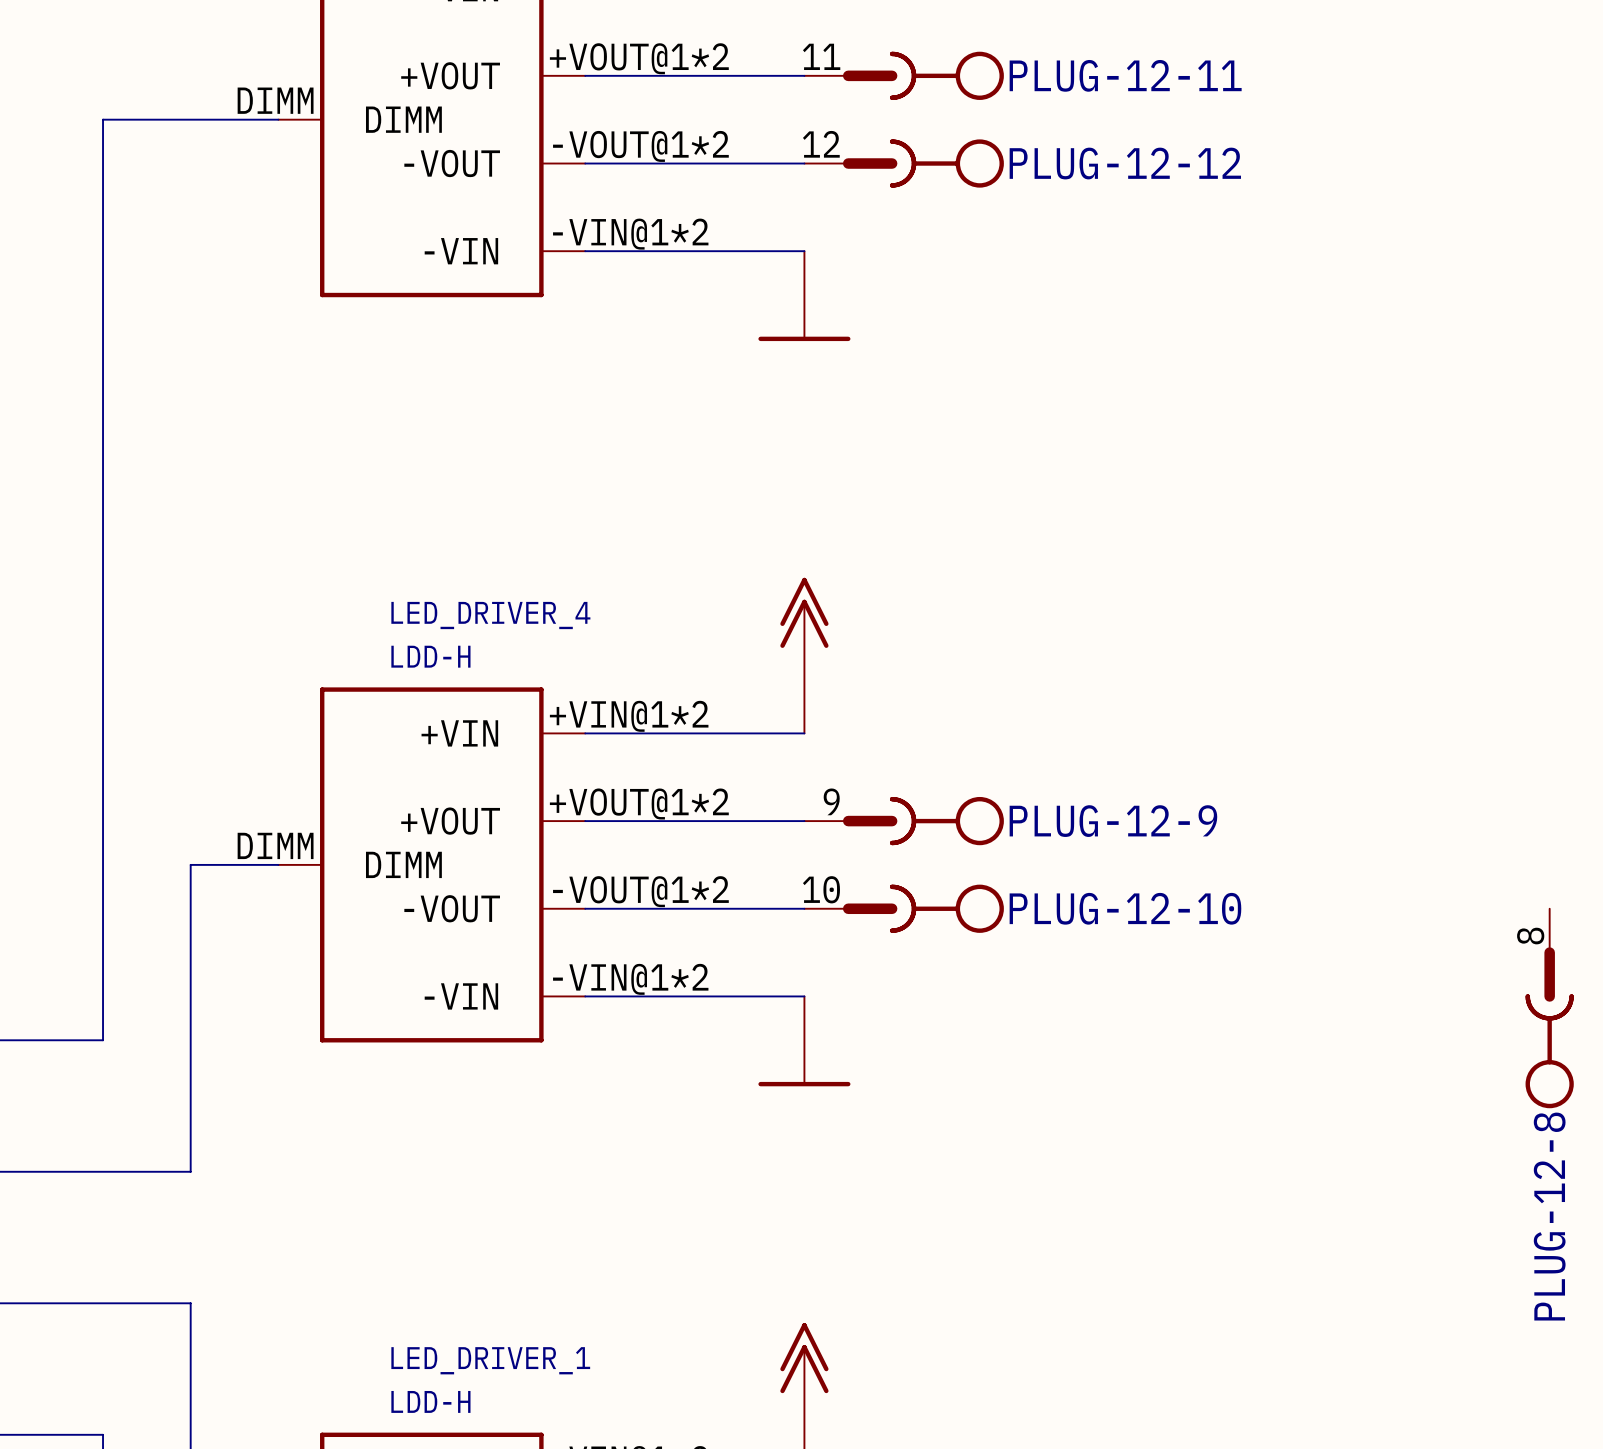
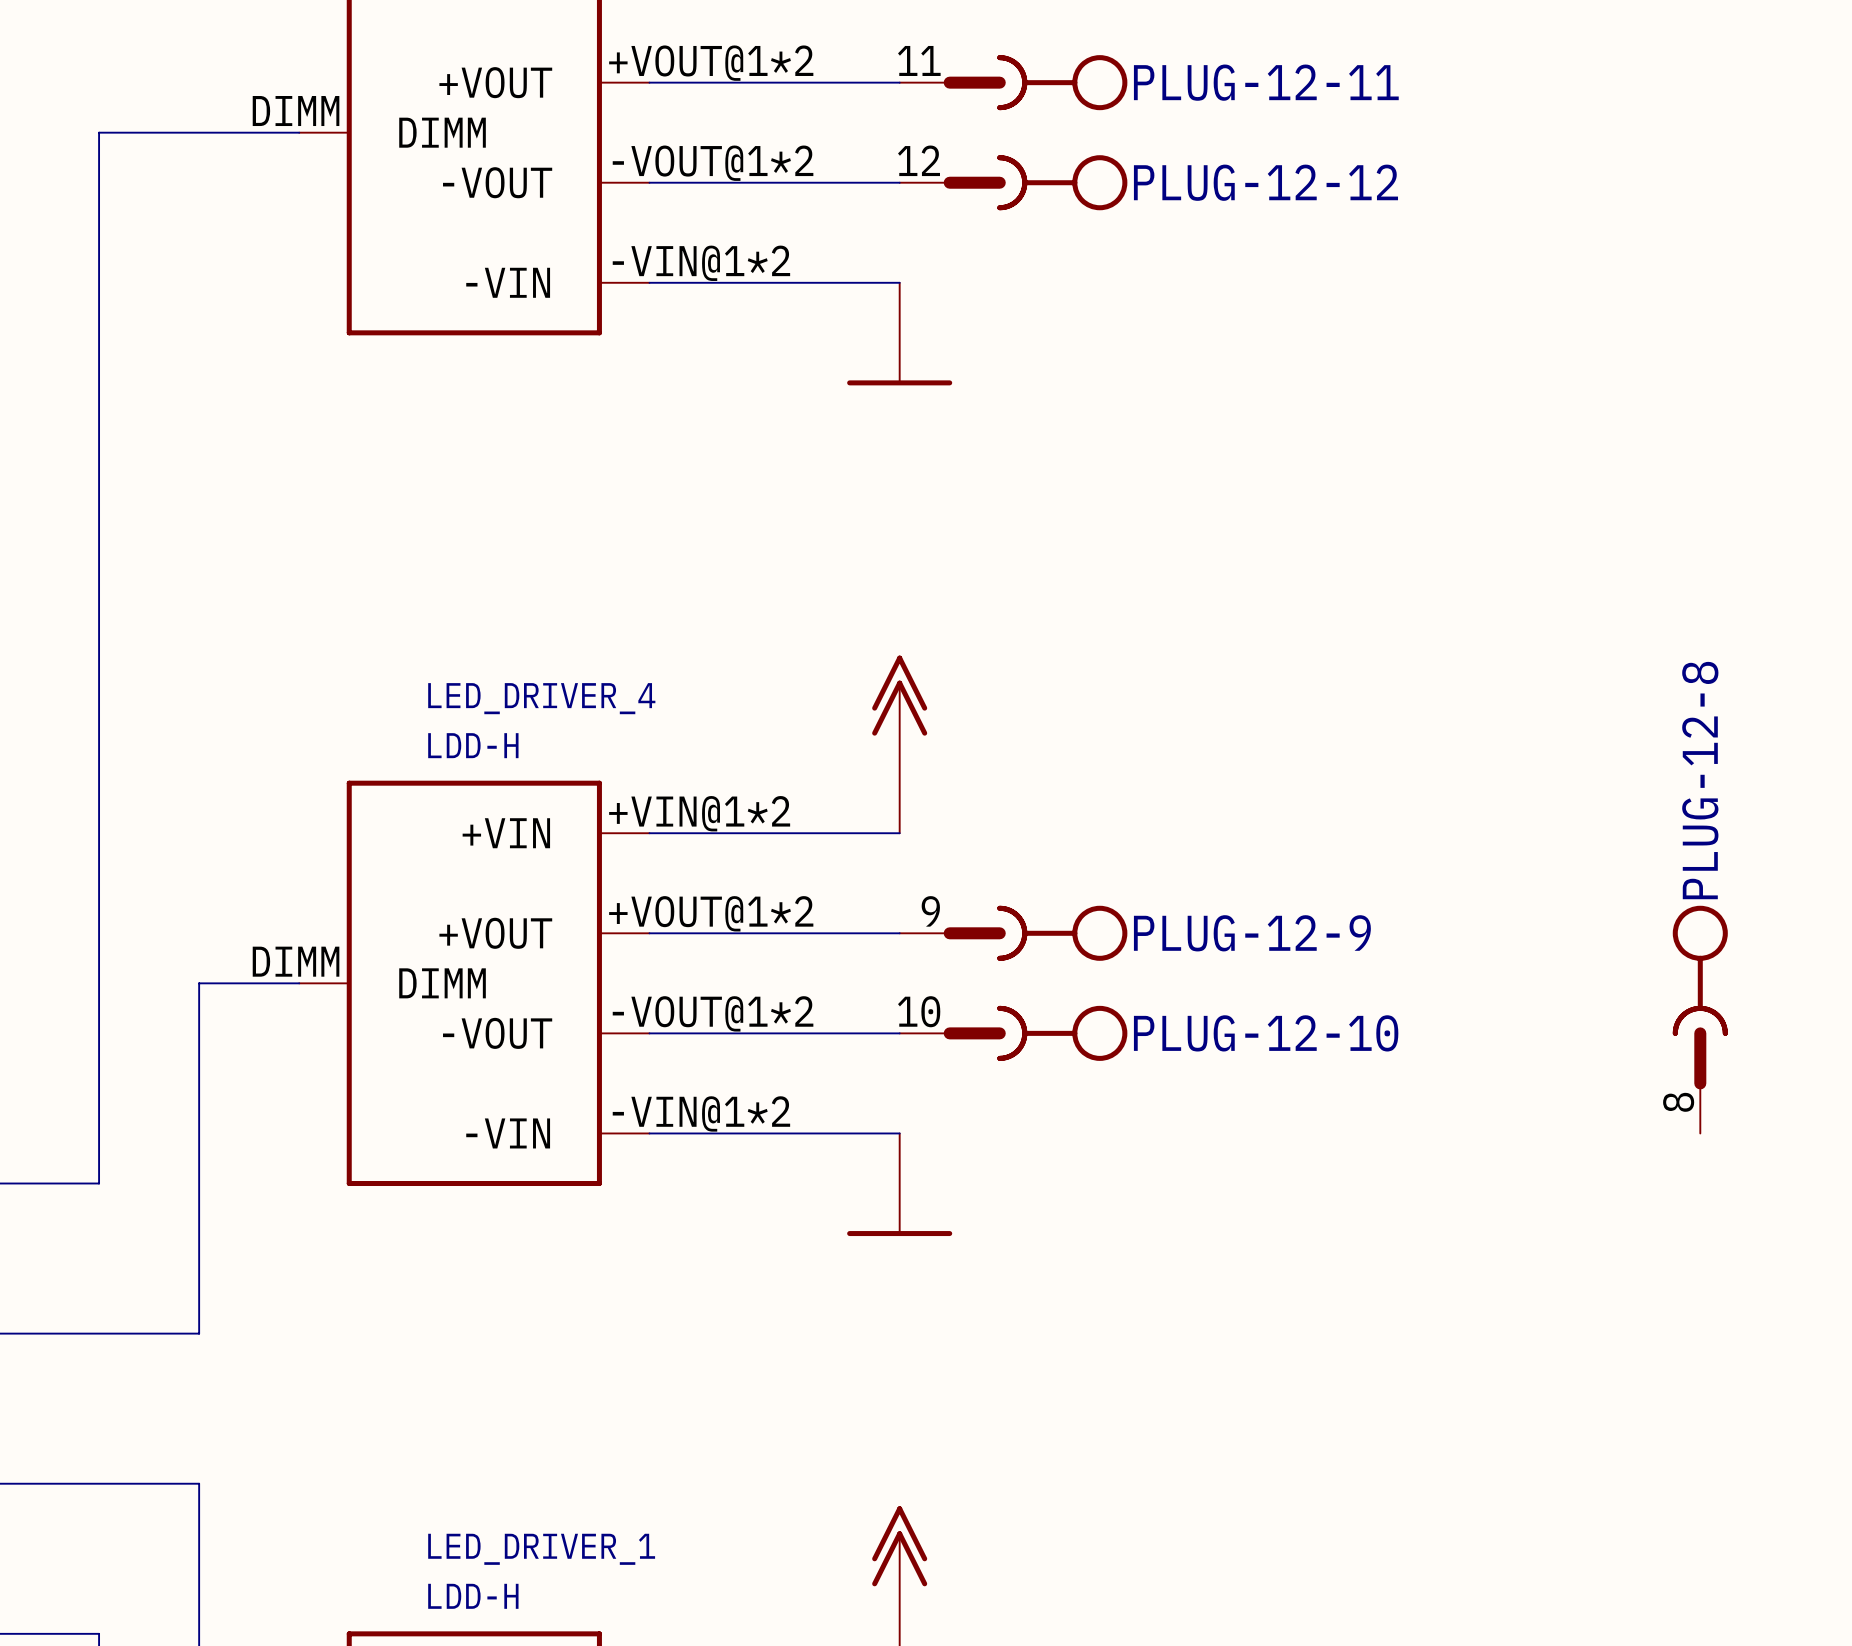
PLUG-12-8 position: (1549, 1008) -> (1700, 1019)
PLUG-12-8 rotation: 0° (1549, 1027) -> 180° (1700, 997)

